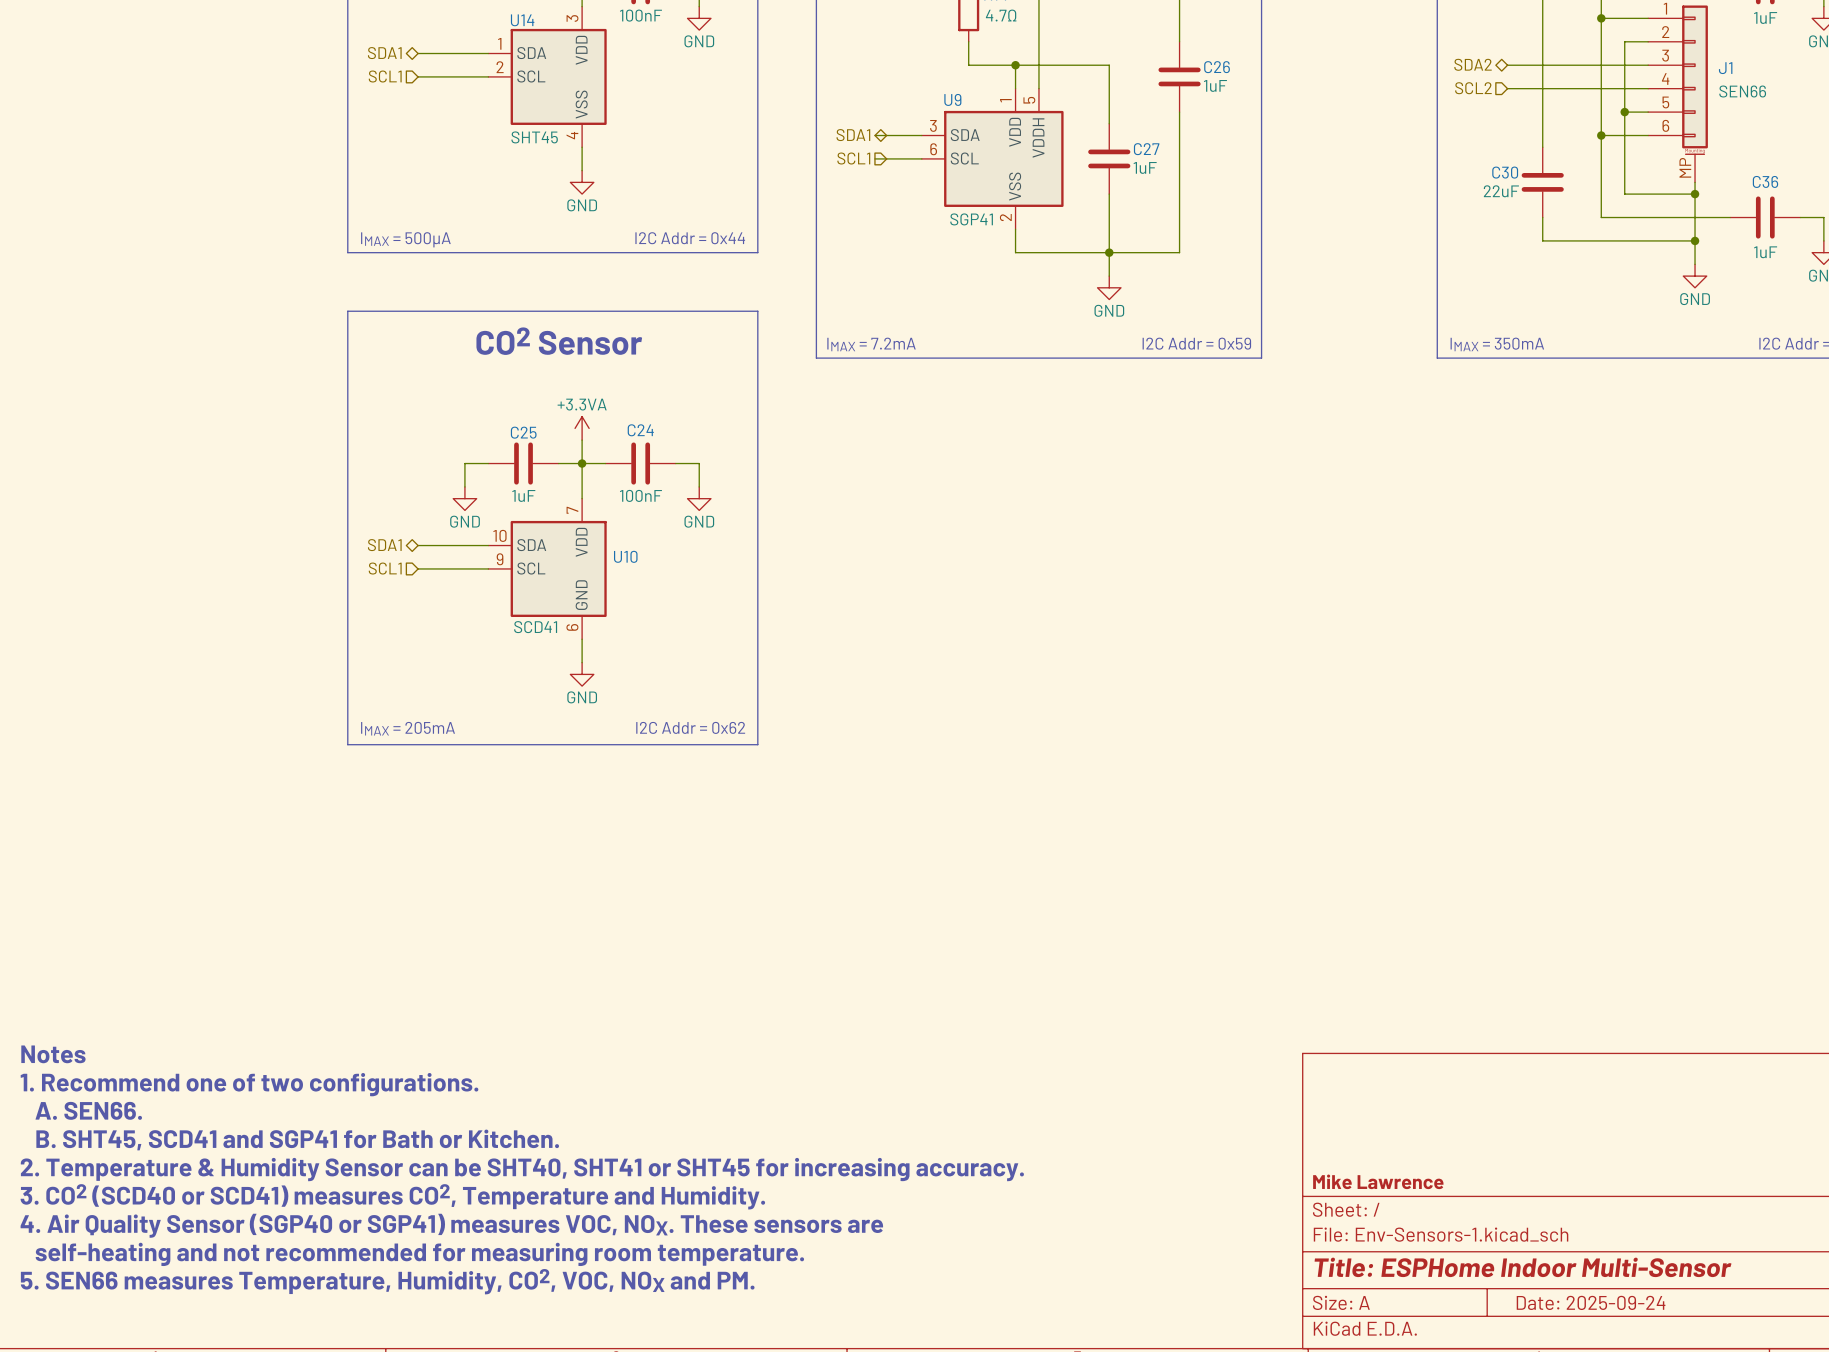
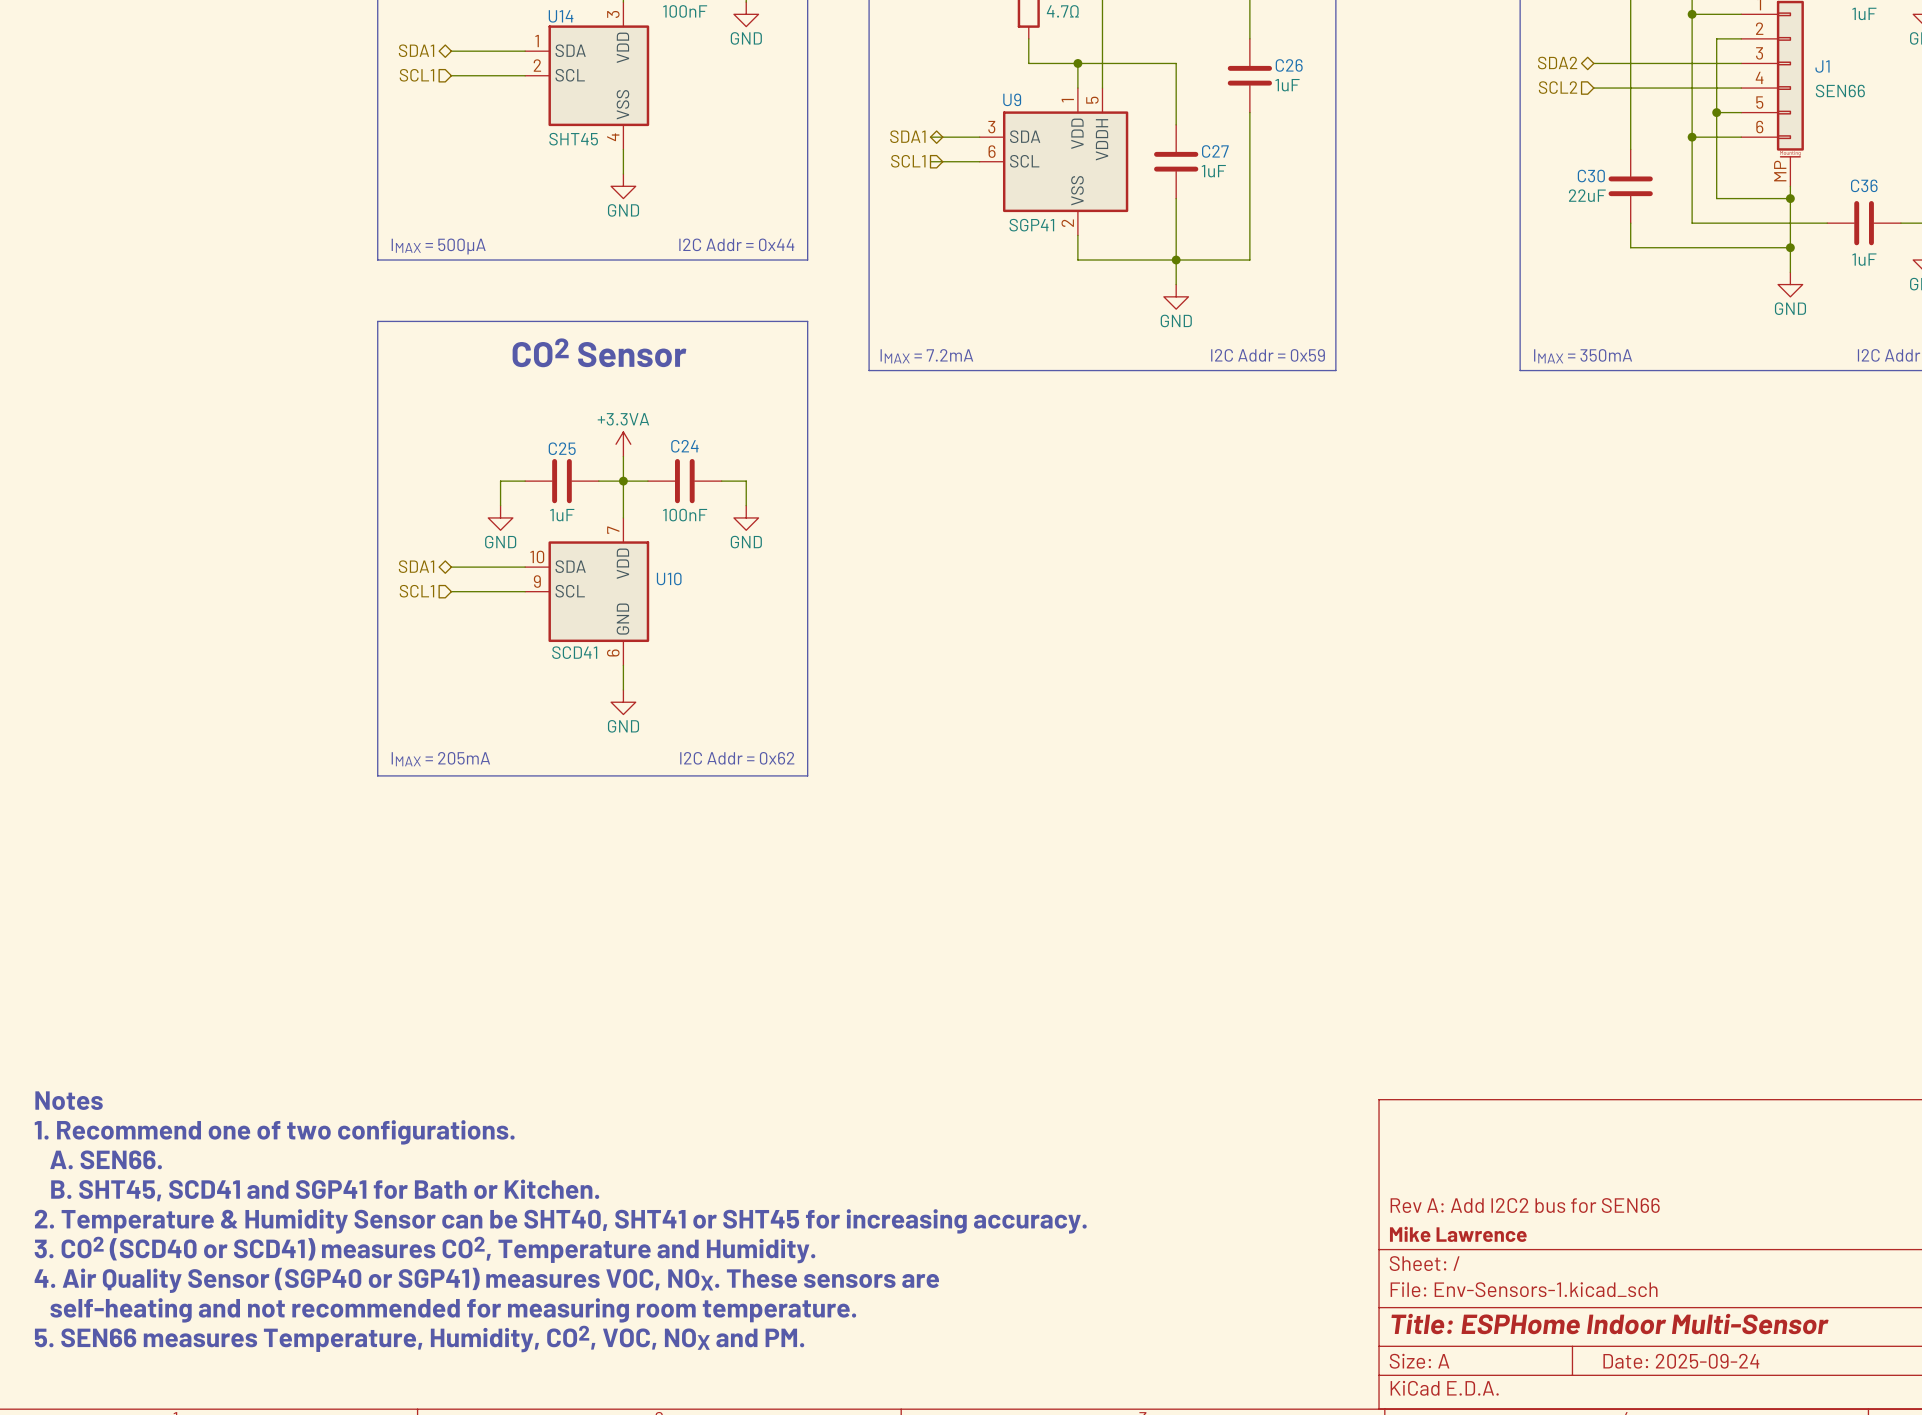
title block: none -> Rev A: Add I2C2 bus for SEN66 (1525, 1205)

